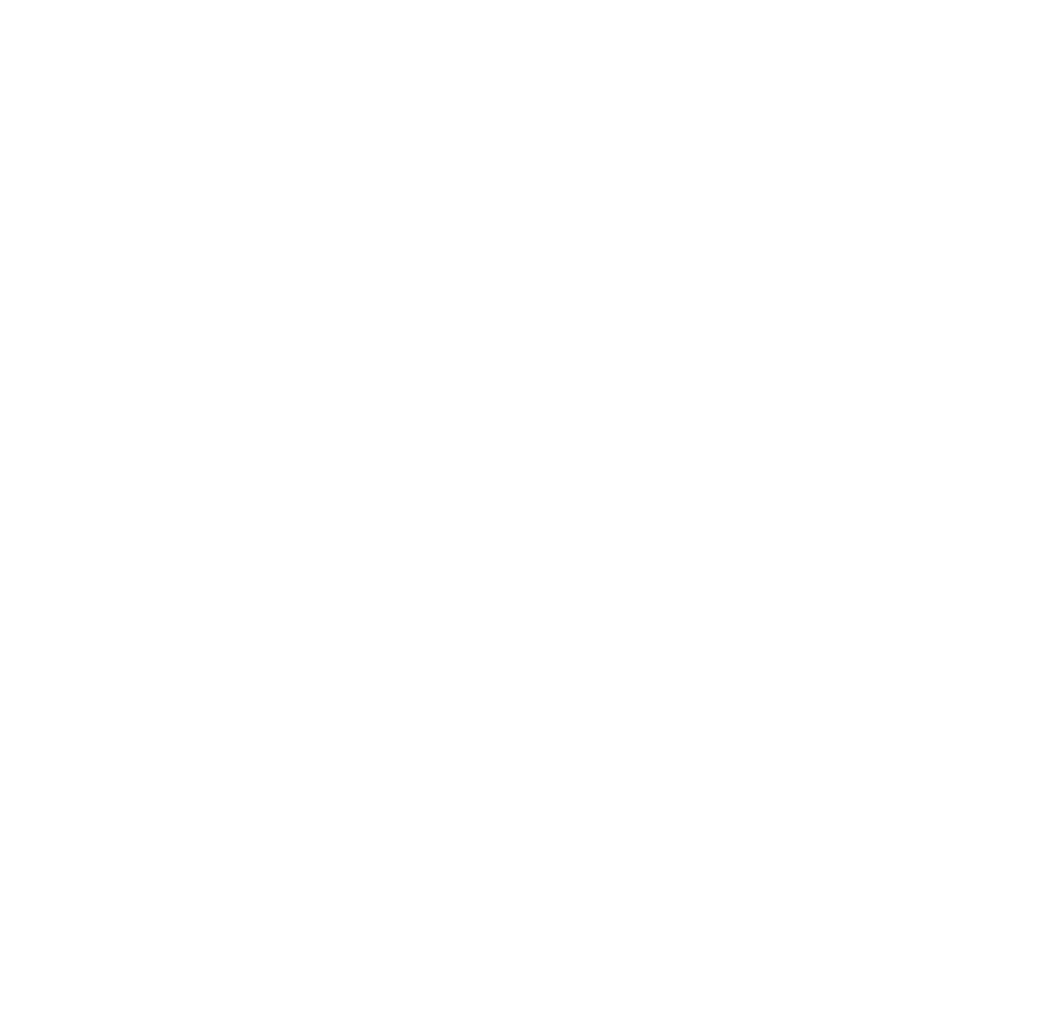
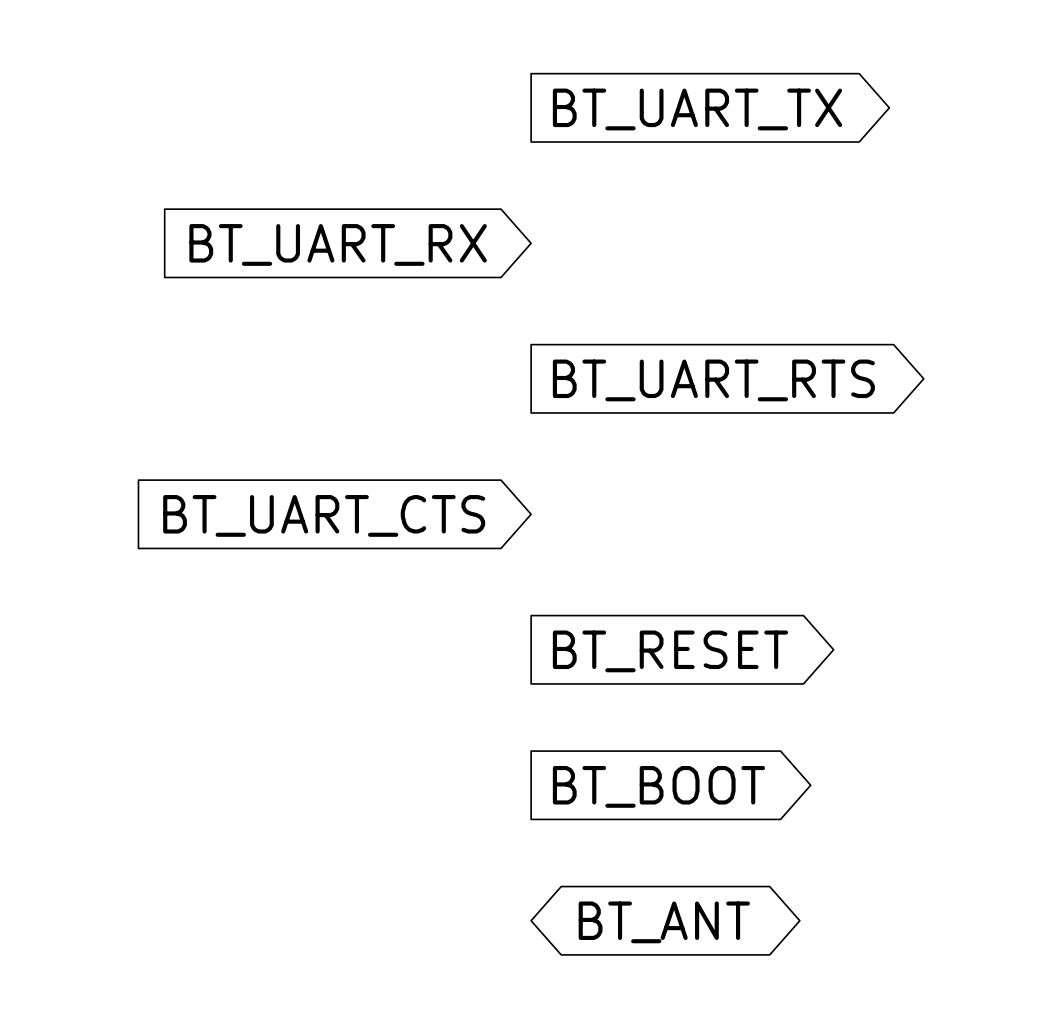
global label: none -> BT_UART_TX (697, 109)
global label: none -> BT_UART_RX (338, 244)
global label: none -> BT_UART_RTS (713, 380)
global label: none -> BT_UART_CTS (324, 515)
global label: none -> BT_RESET (670, 651)
global label: none -> BT_BOOT (658, 786)
global label: none -> BT_ANT (664, 922)

